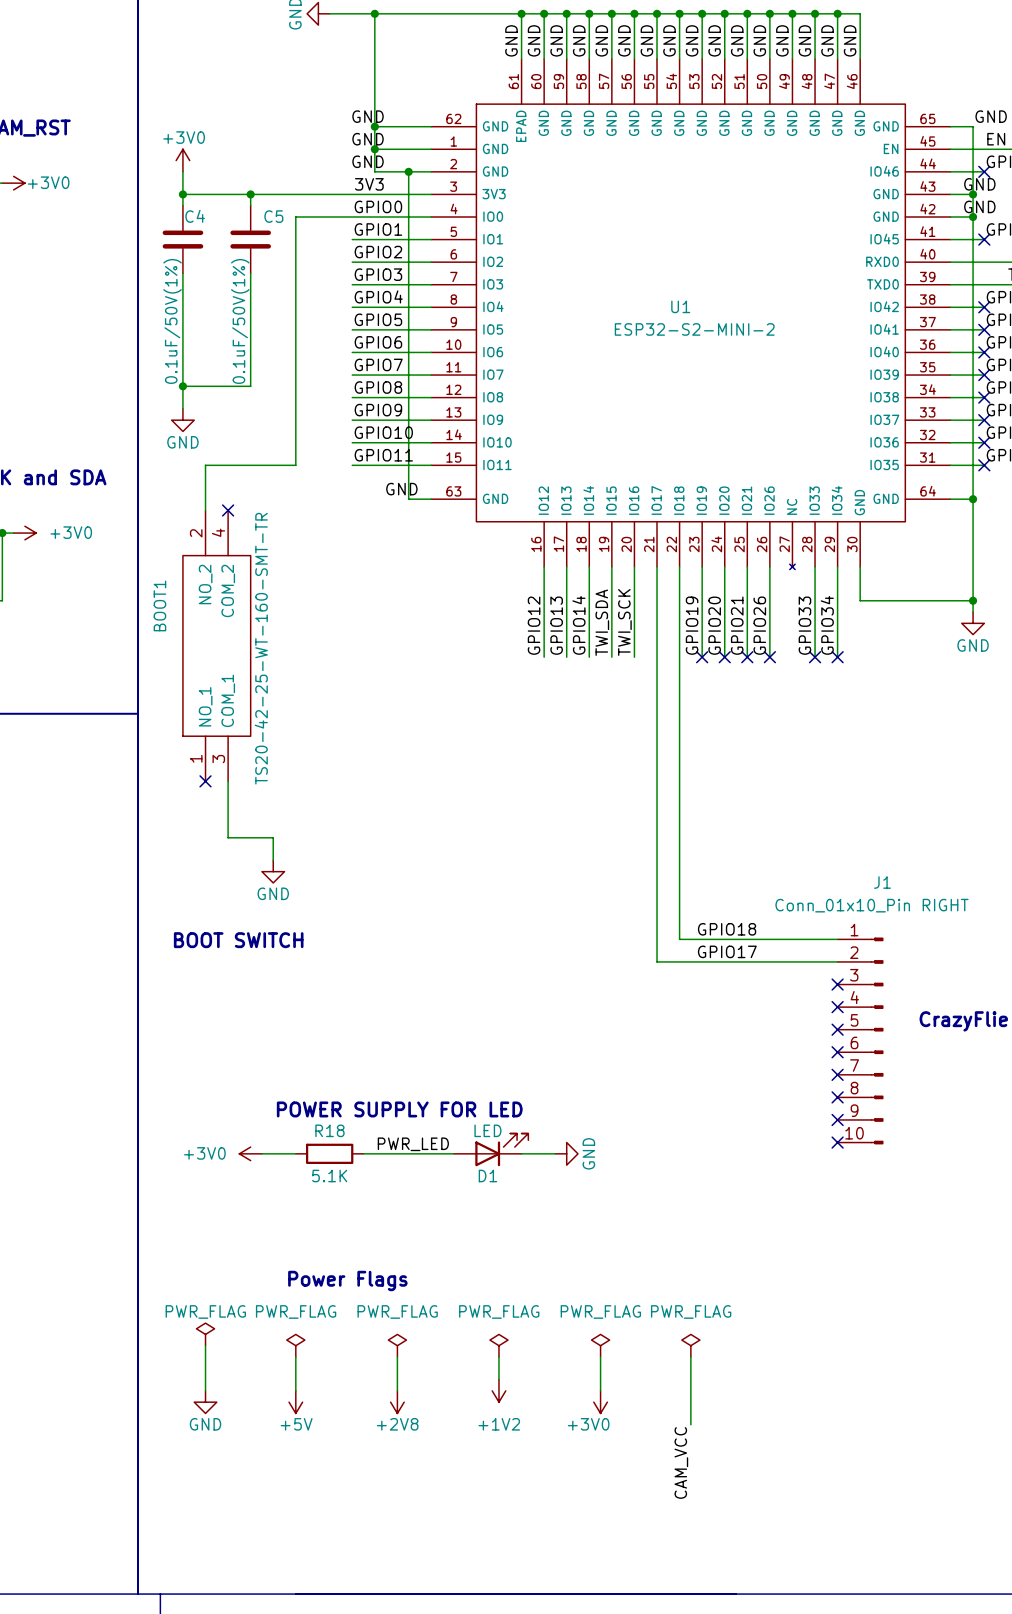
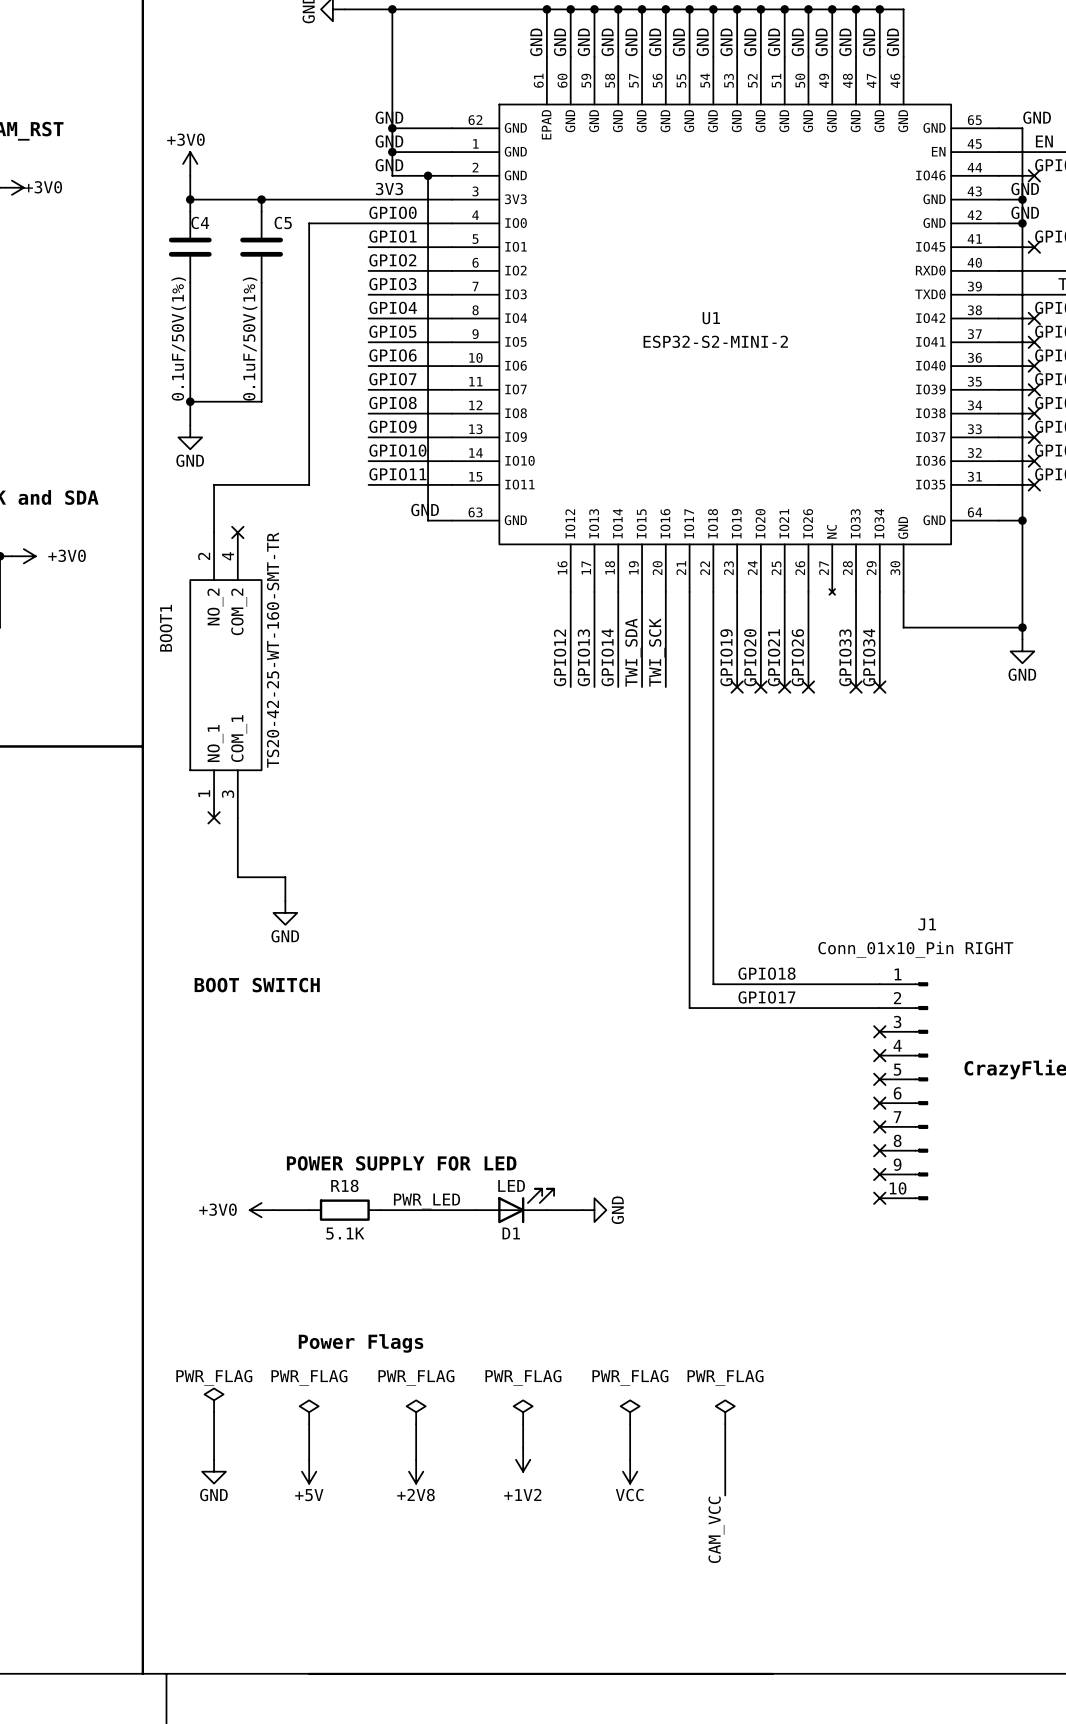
power symbol: +3V0 (600, 1402) -> VCC (630, 1471)

